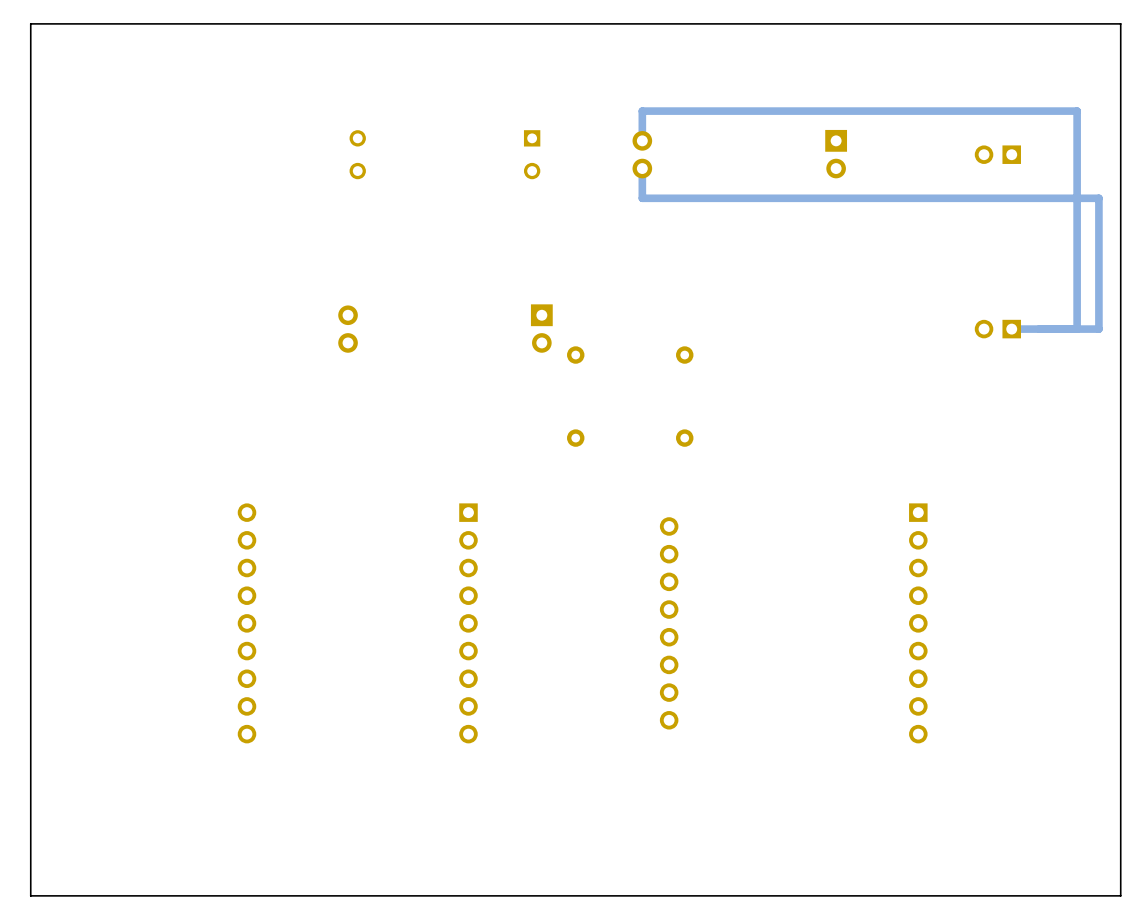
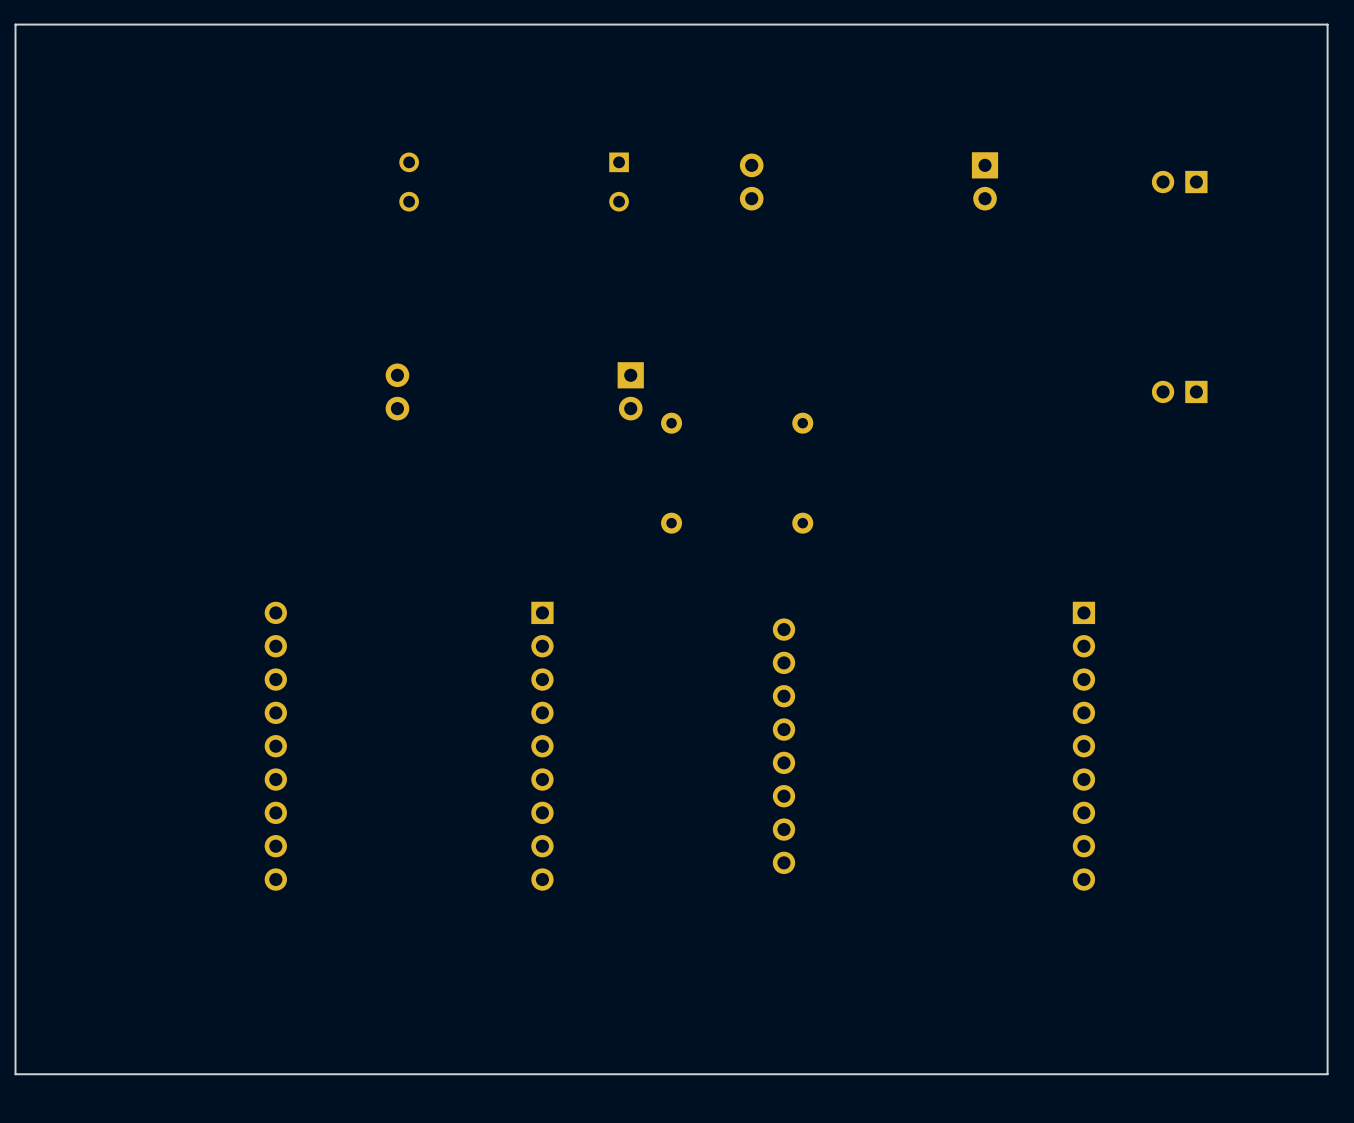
track: (642, 140) (642, 111) (1077, 111) (1077, 329) -> none
track: (642, 168) (642, 198) (1098, 198) (1098, 329) (1011, 329) -> none

